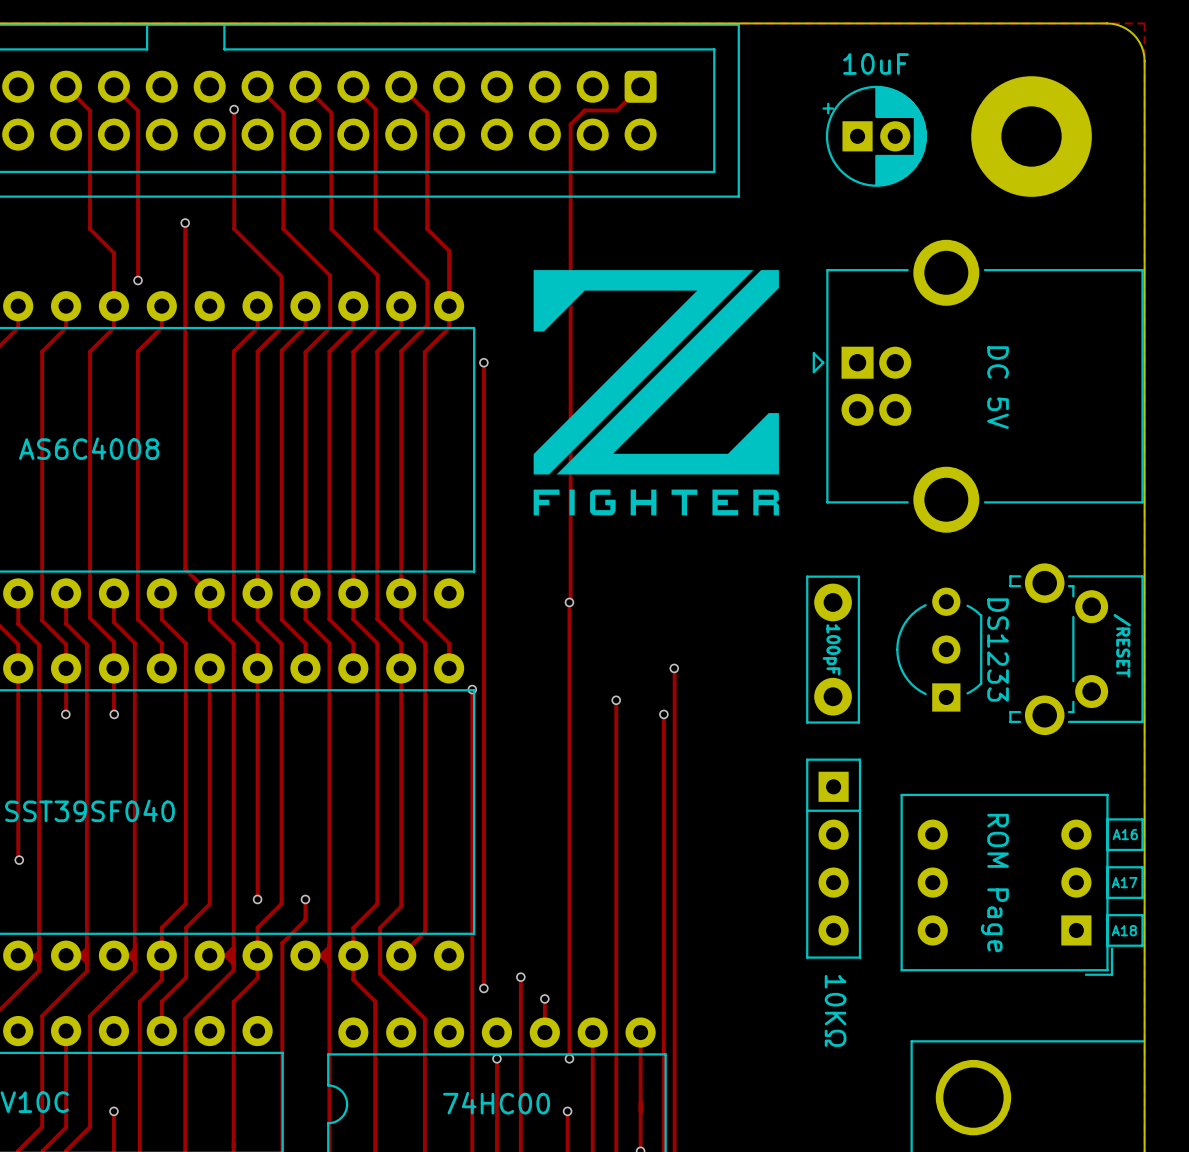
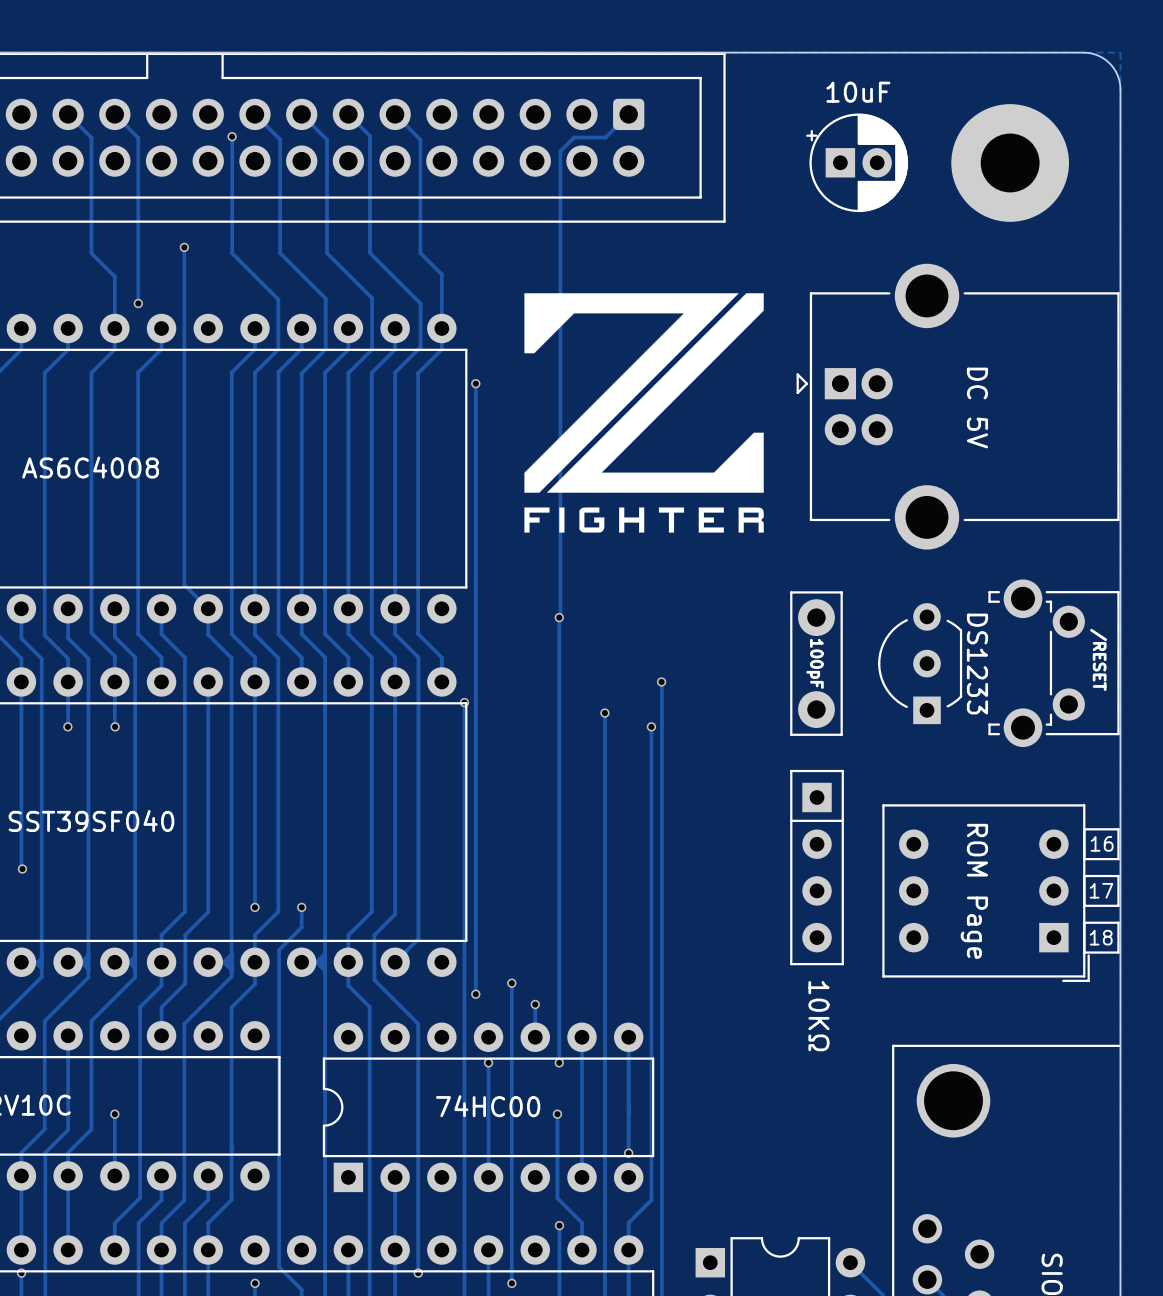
text: A16 (1125, 834) -> 16 (1102, 843)
text: A17 (1124, 882) -> 17 (1101, 890)
text: A18 (1124, 930) -> 18 (1101, 937)

